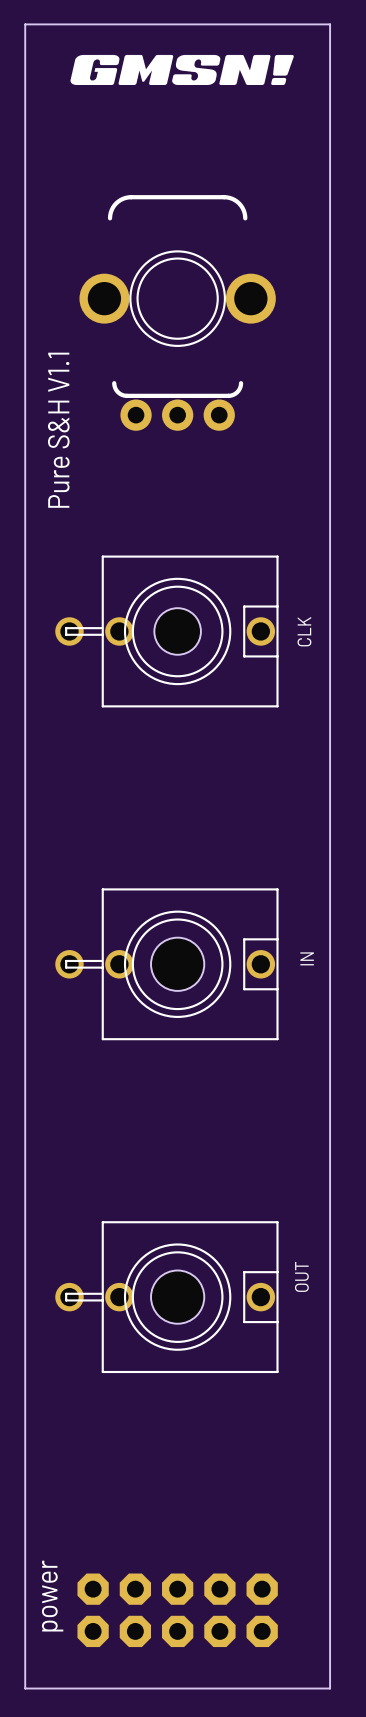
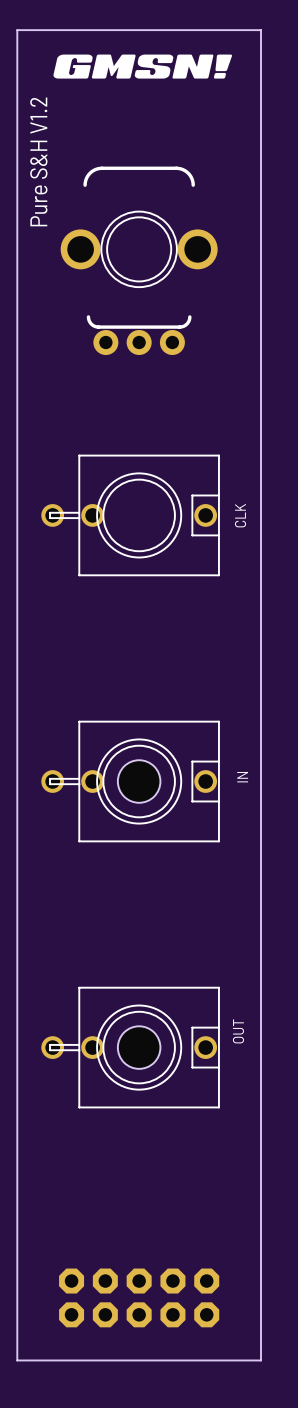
text: Pure S&H V1.1 (58, 430) -> Pure S&H V1.2 (38, 161)
part: (177, 631) -> none
text: power (52, 1596) -> none

